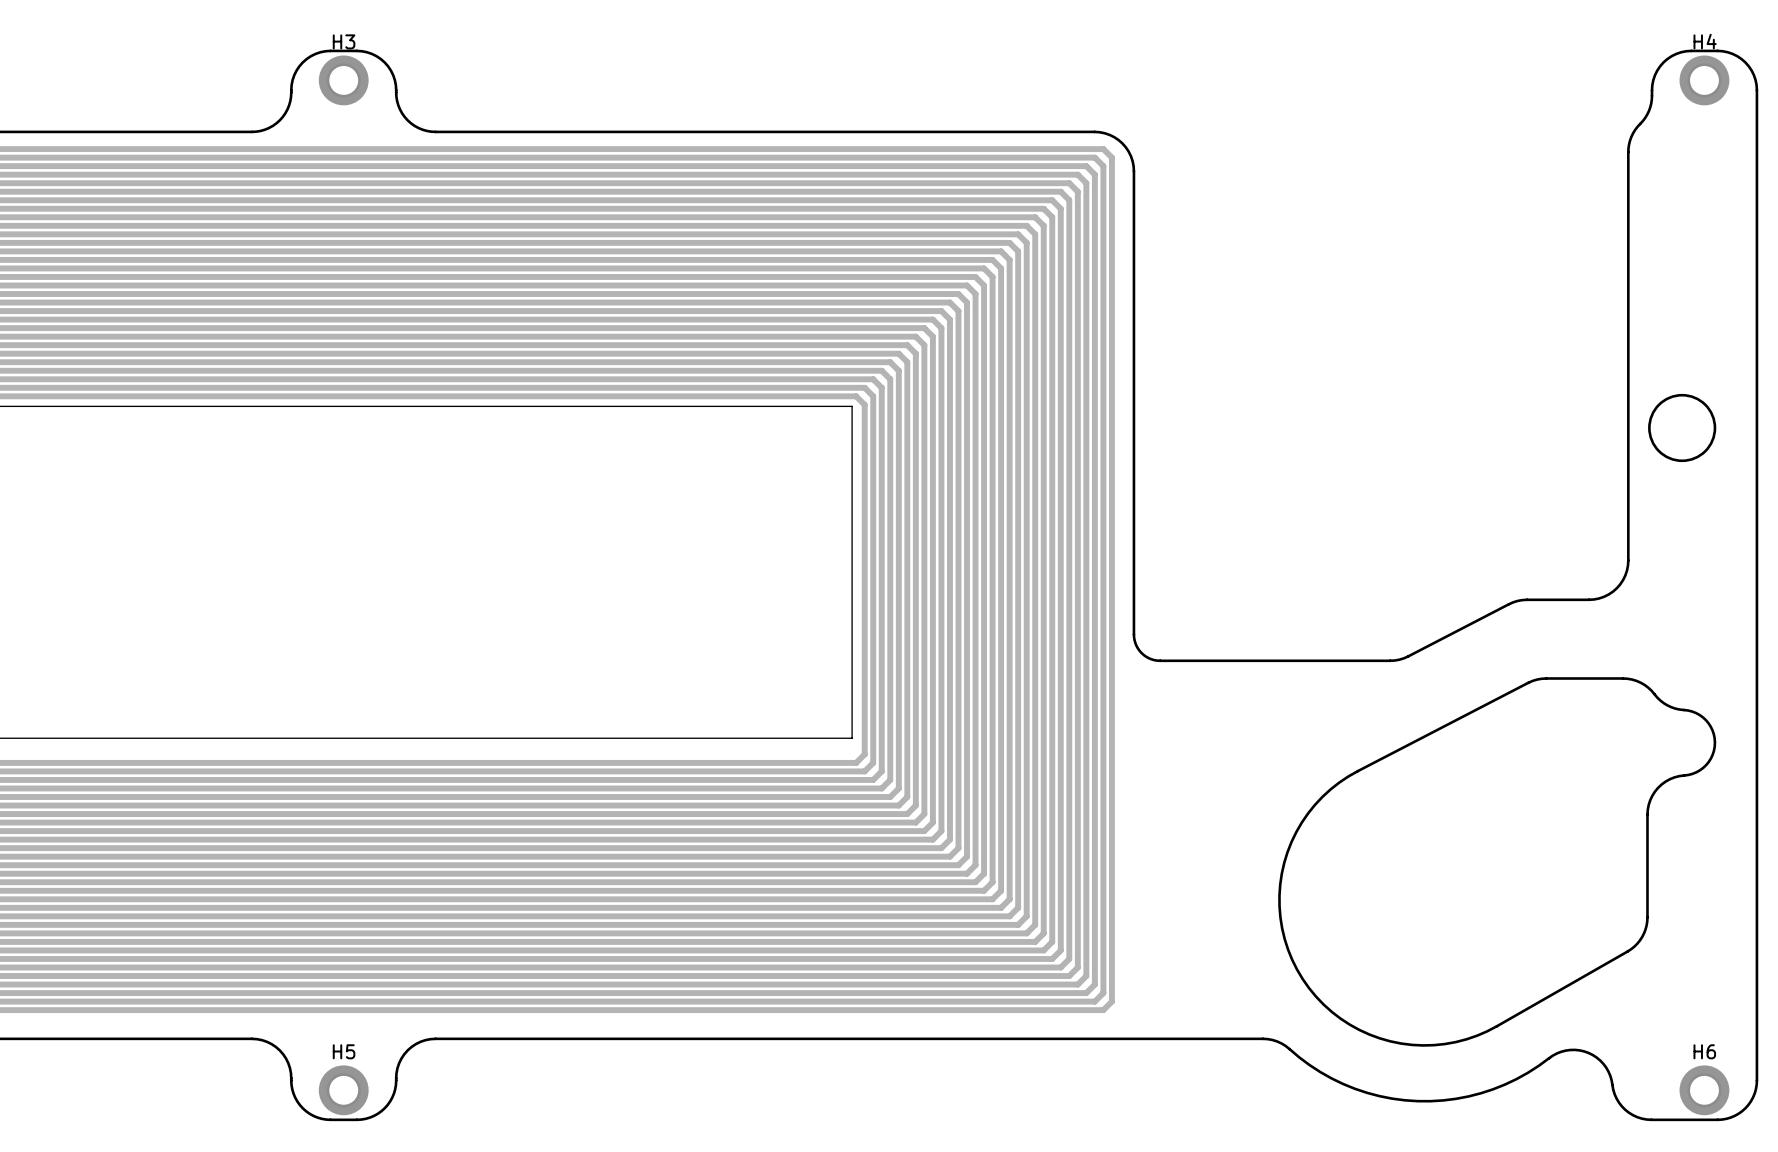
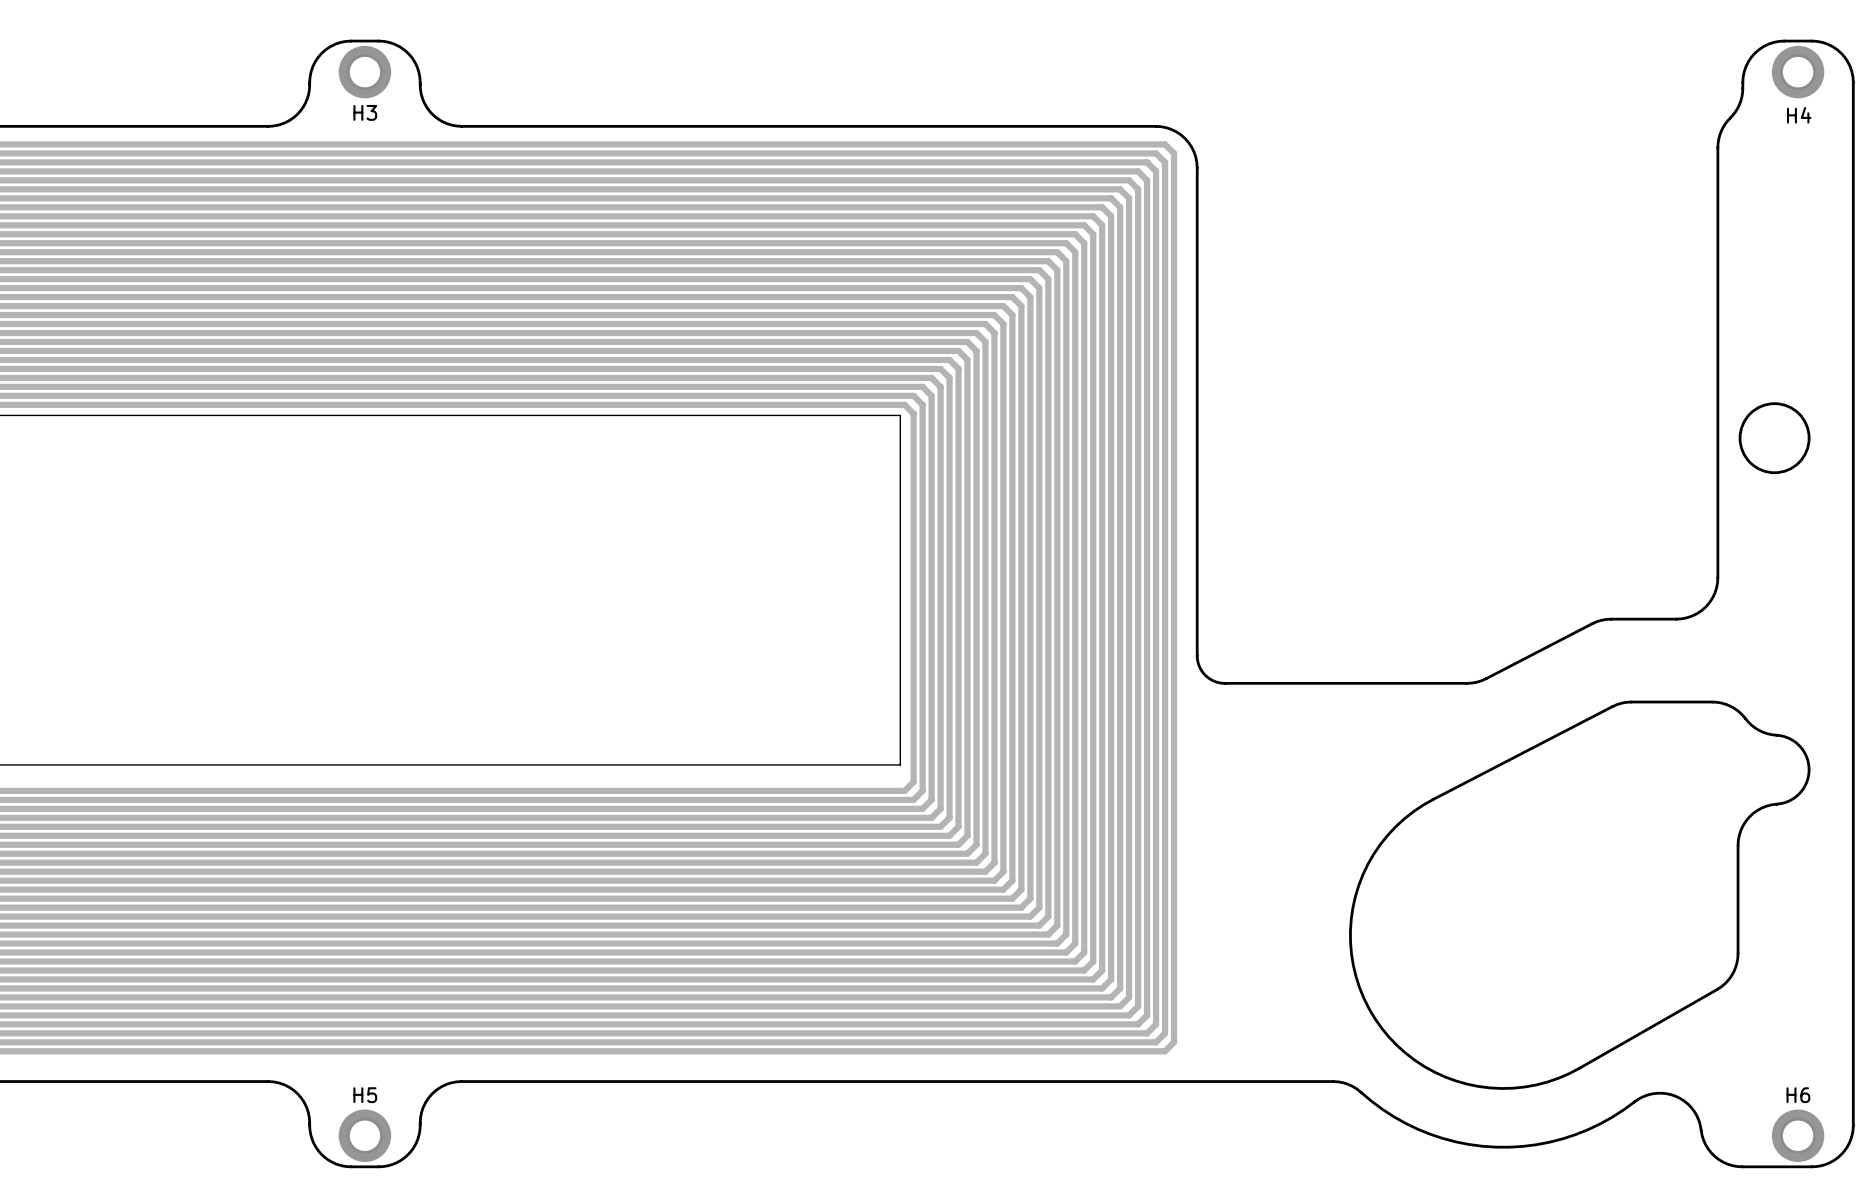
H3 name position: H3 (344, 41) -> H3 (365, 112)
H4 name position: H4 (1705, 41) -> H4 (1799, 115)

